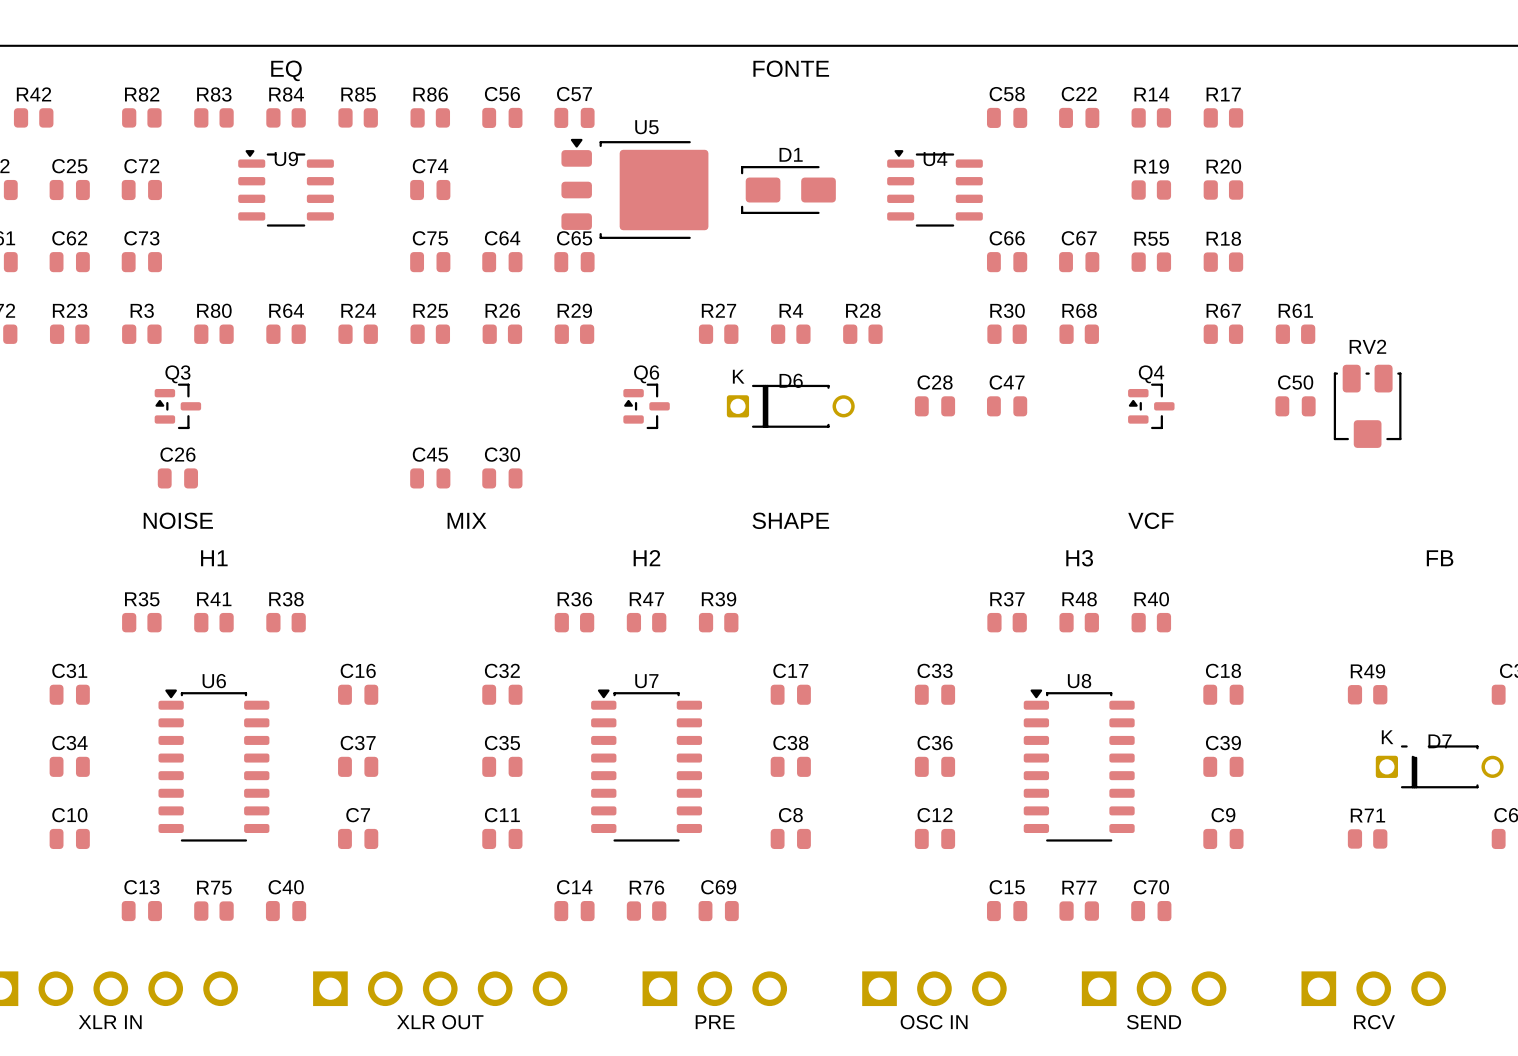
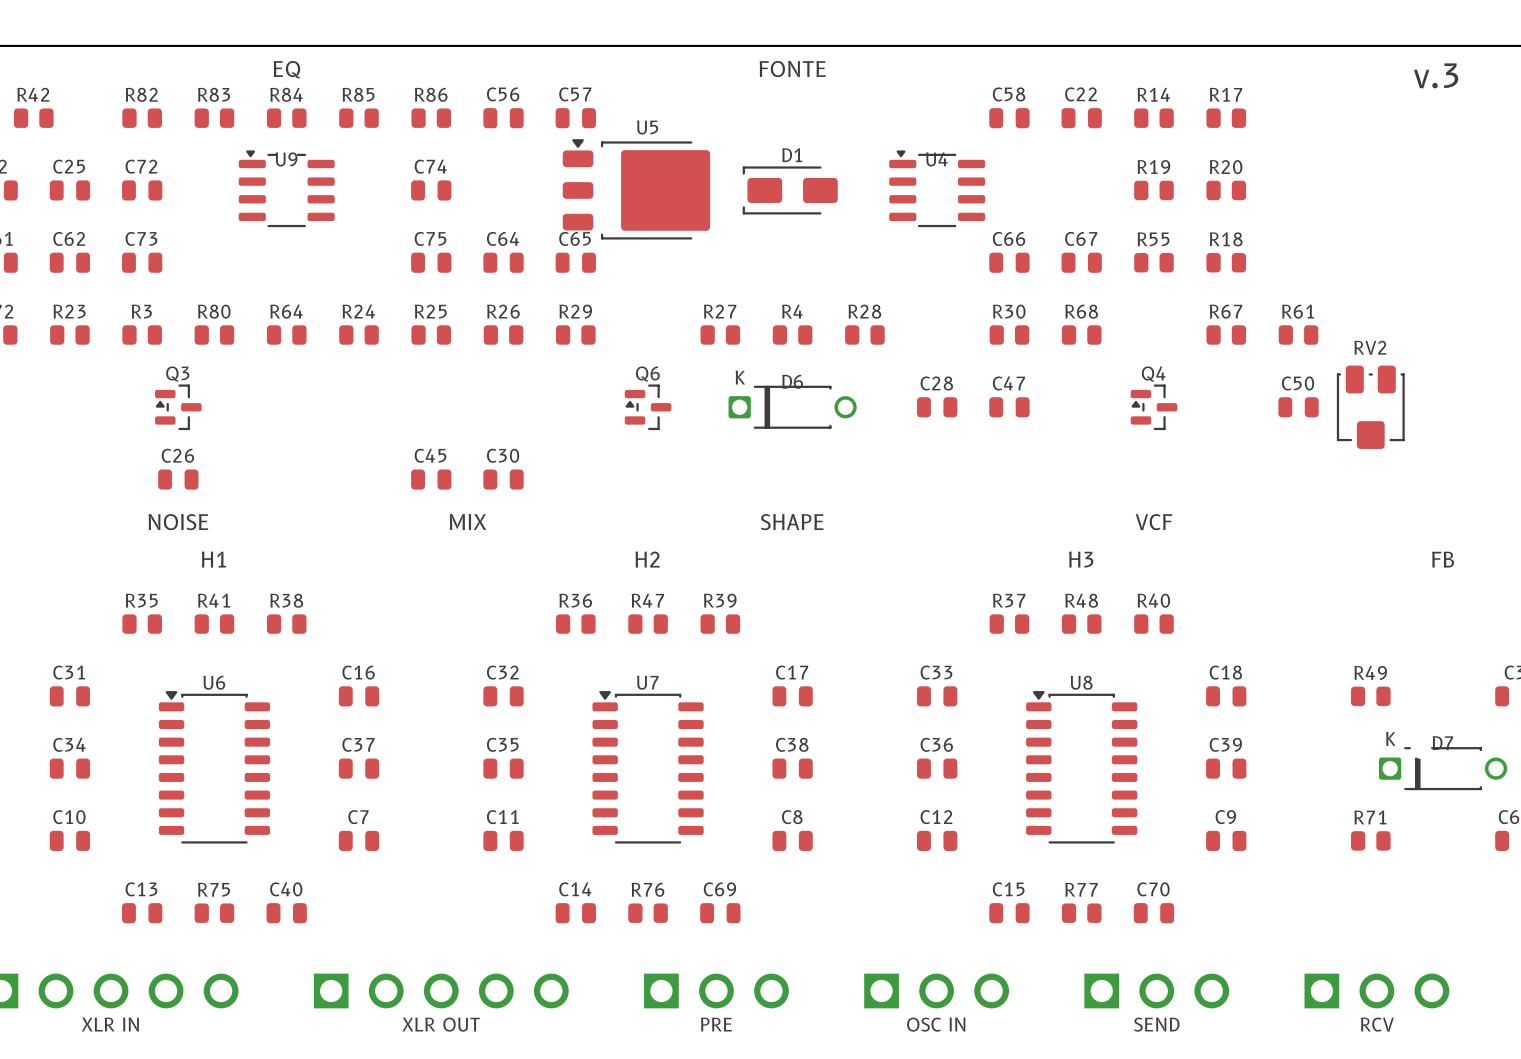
text: none -> v.3 (1436, 75)

